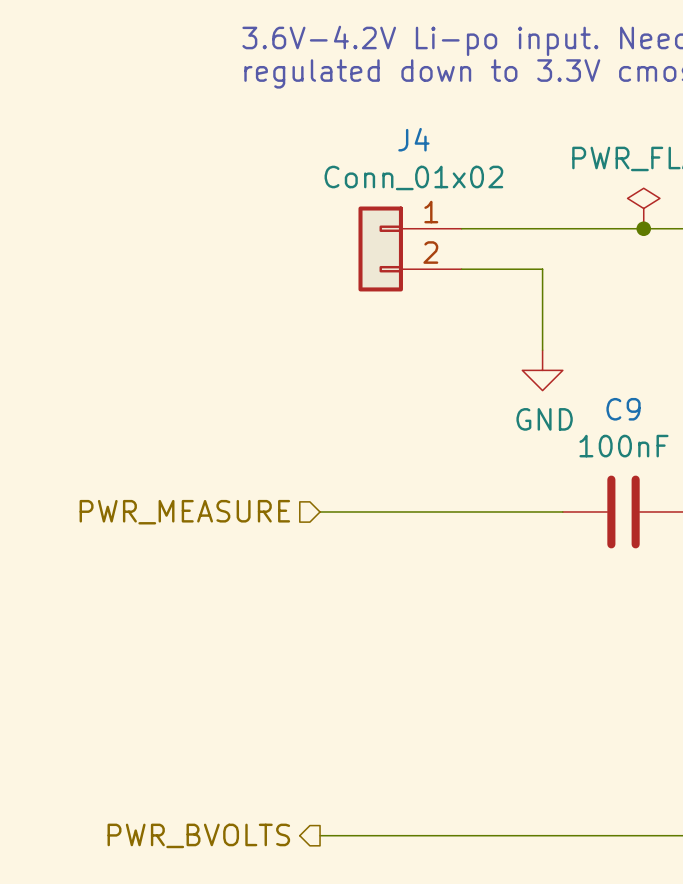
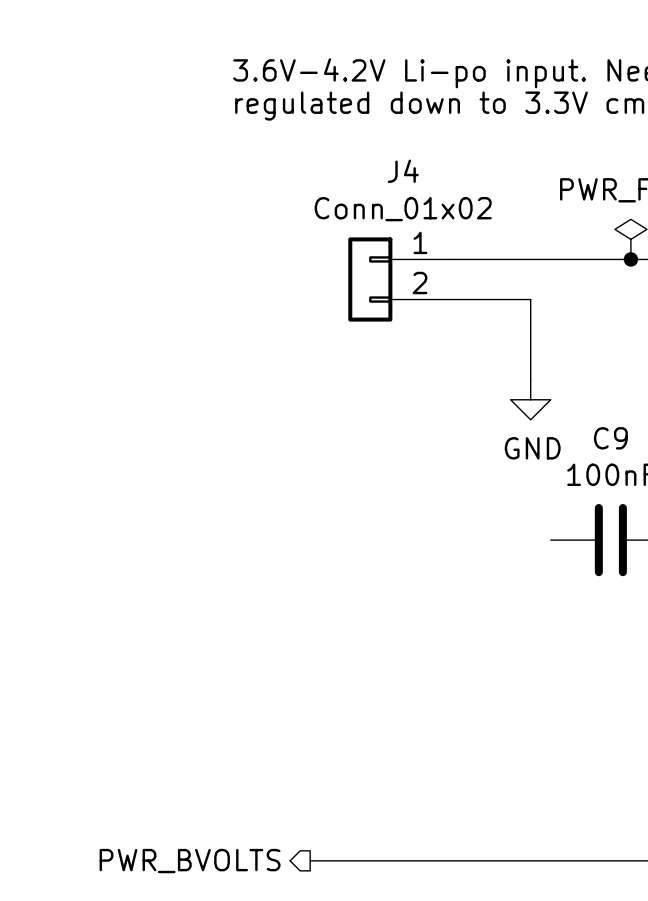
wire: (320, 511) (562, 511) -> none
hierarchical label: PWR_MEASURE (184, 512) -> none

